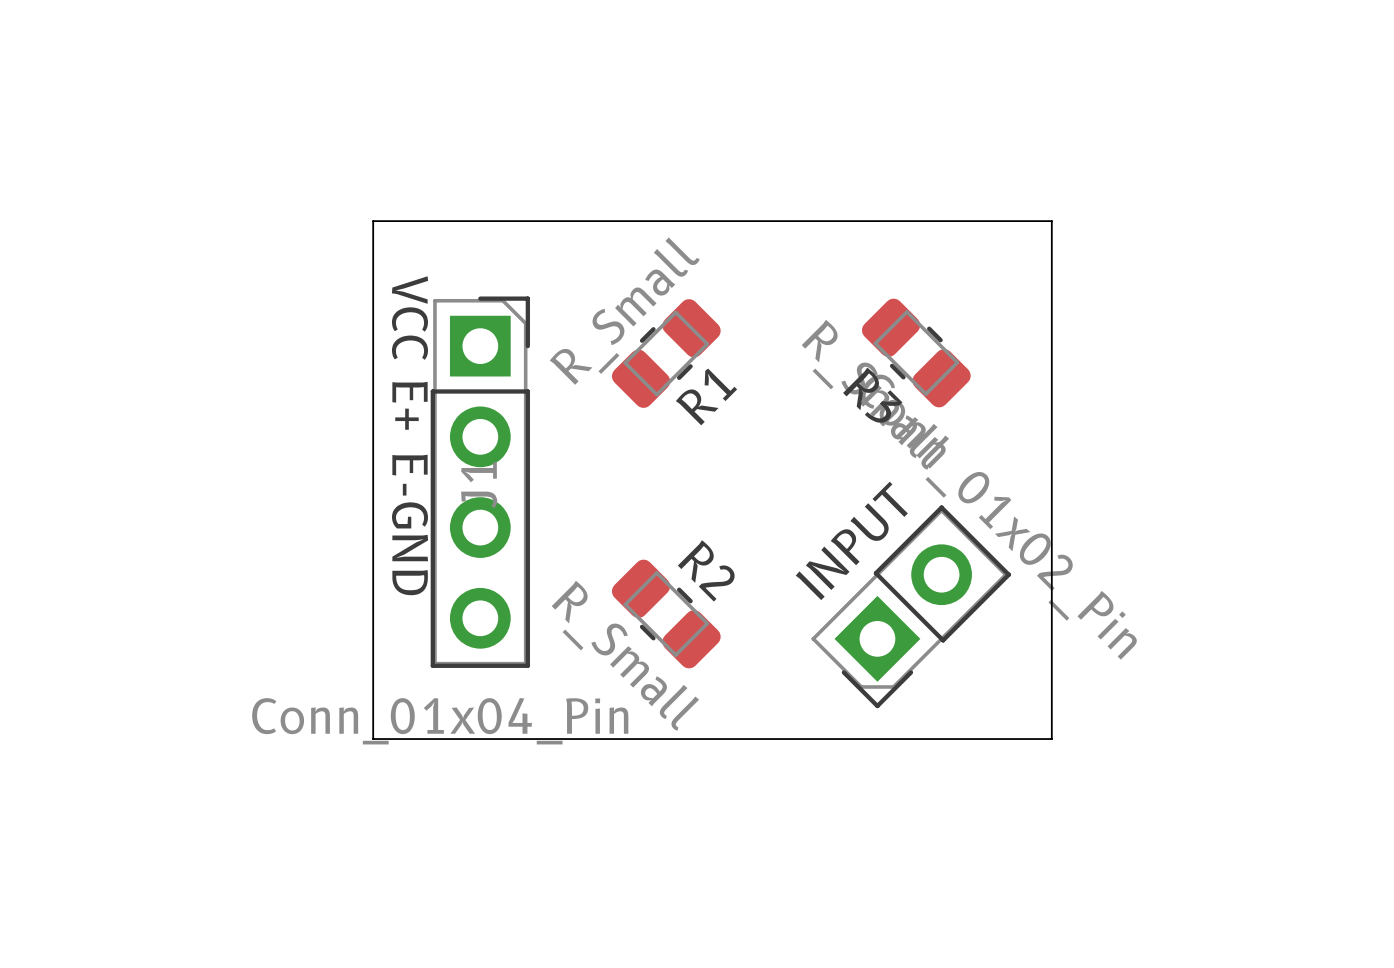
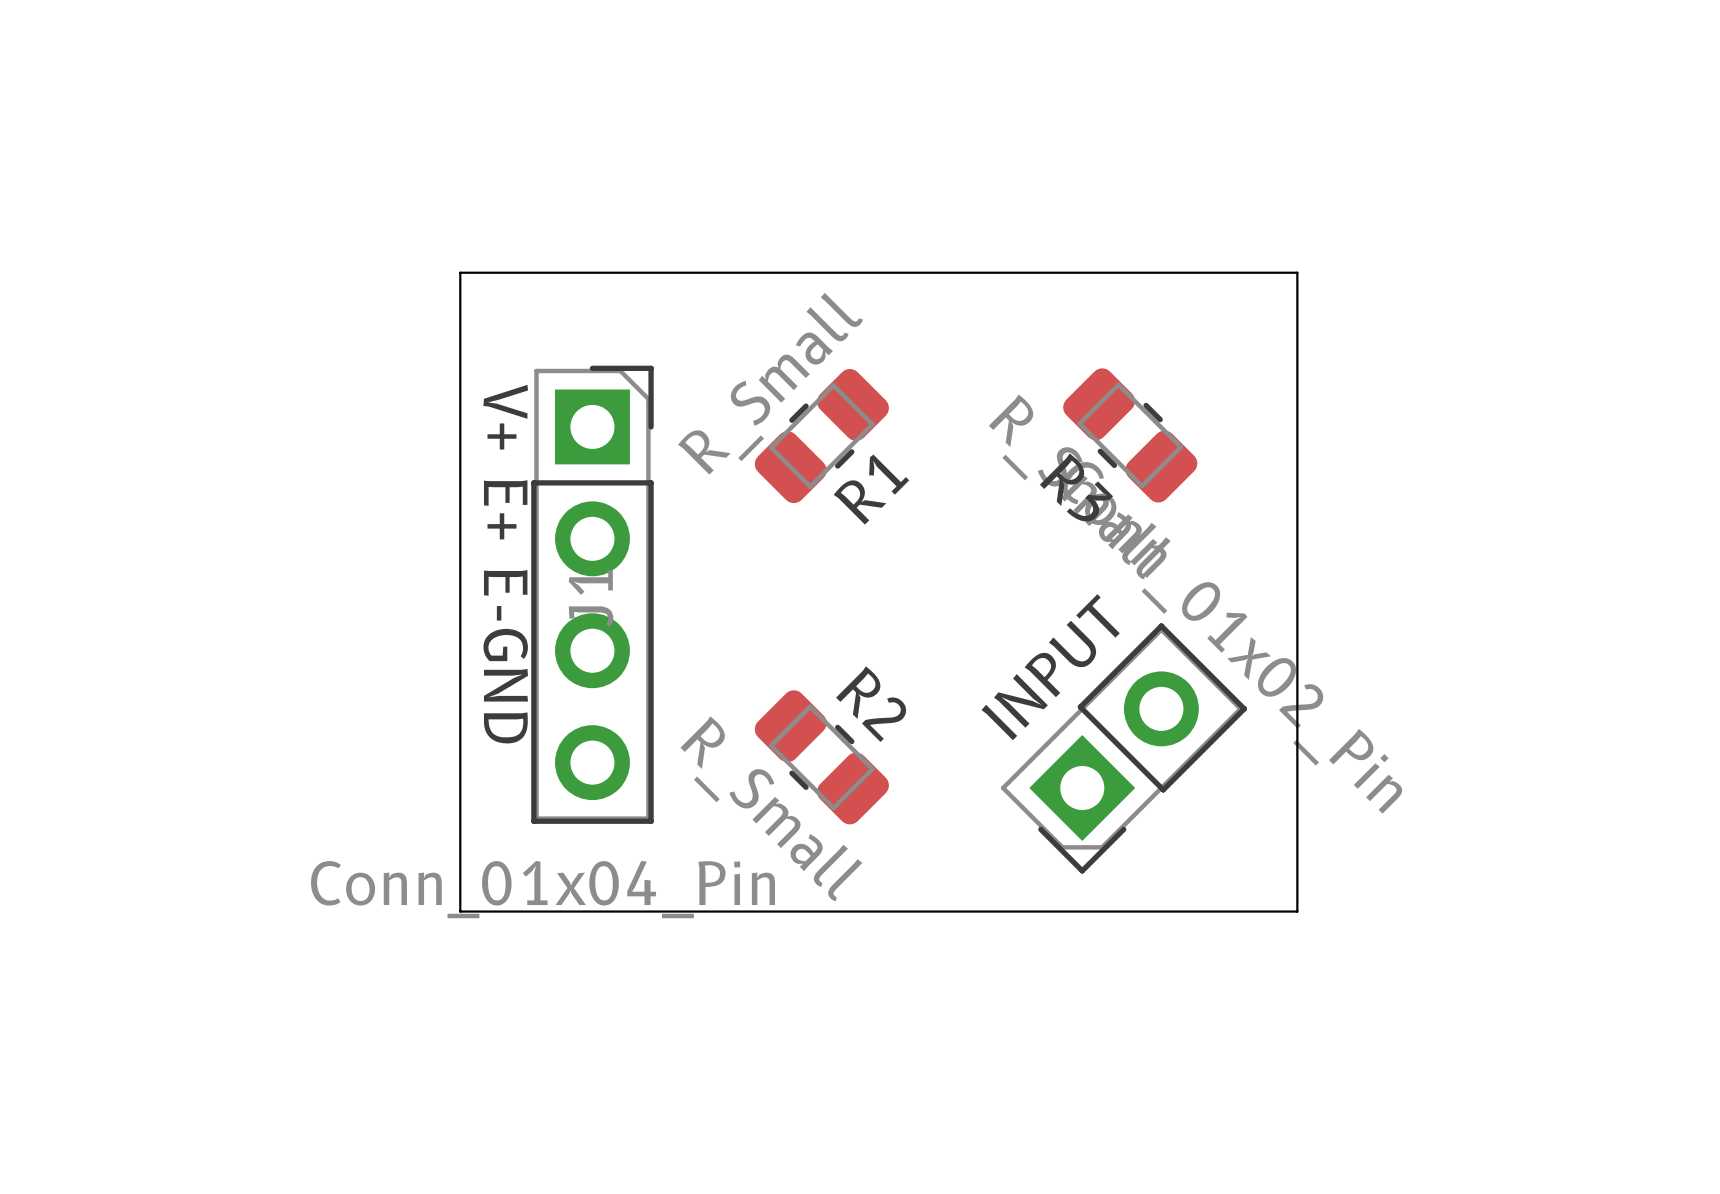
text: VCC E+ E-GND (409, 435) -> V+ E+ E-GND (505, 564)

